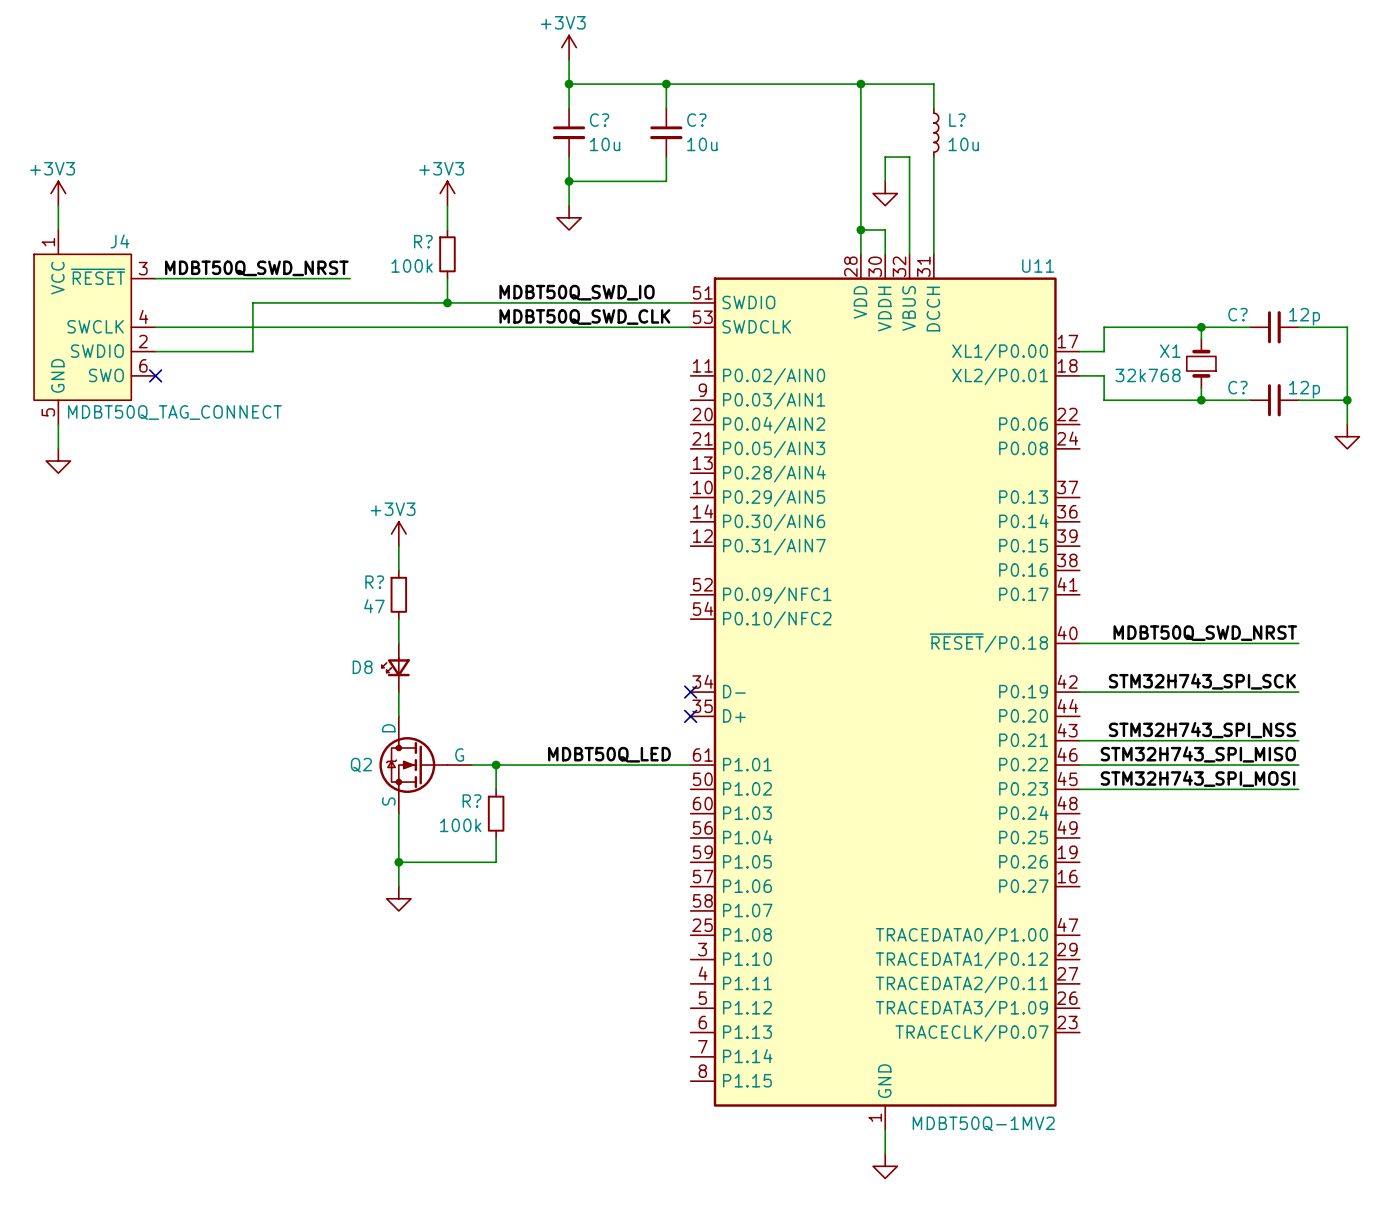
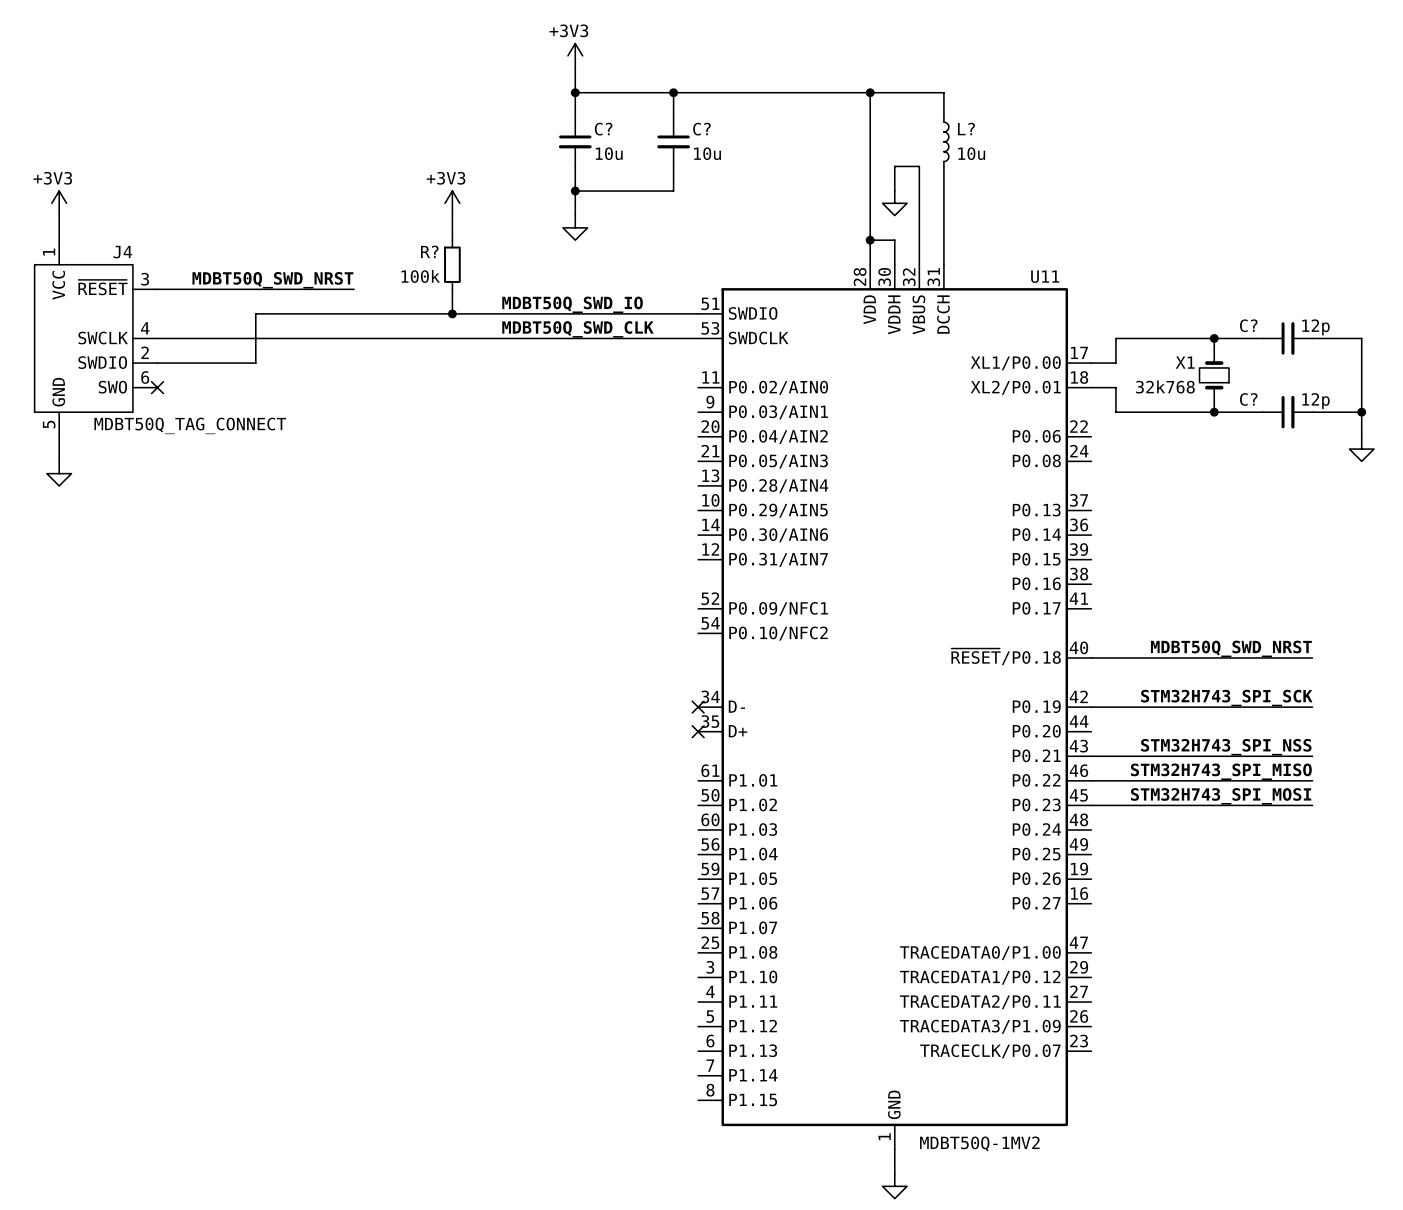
power symbol: +3V3 (398, 533) -> none
wire: (398, 546) (398, 570) -> none
R?: 47 (398, 594) -> none
wire: (398, 619) (398, 643) -> none
D8: (395, 667) -> none
wire: (398, 692) (398, 716) -> none
label: MDBT50Q_LED (609, 754) -> none
Q2: (425, 765) -> none
wire: (471, 765) (690, 765) -> none
wire: (496, 765) (496, 789) -> none
junction: (496, 765) -> none
wire: (398, 813) (398, 886) -> none
R?: 100k (496, 813) -> none
wire: (496, 837) (496, 862) (398, 862) -> none
junction: (398, 862) -> none
power symbol: (398, 898) -> none

